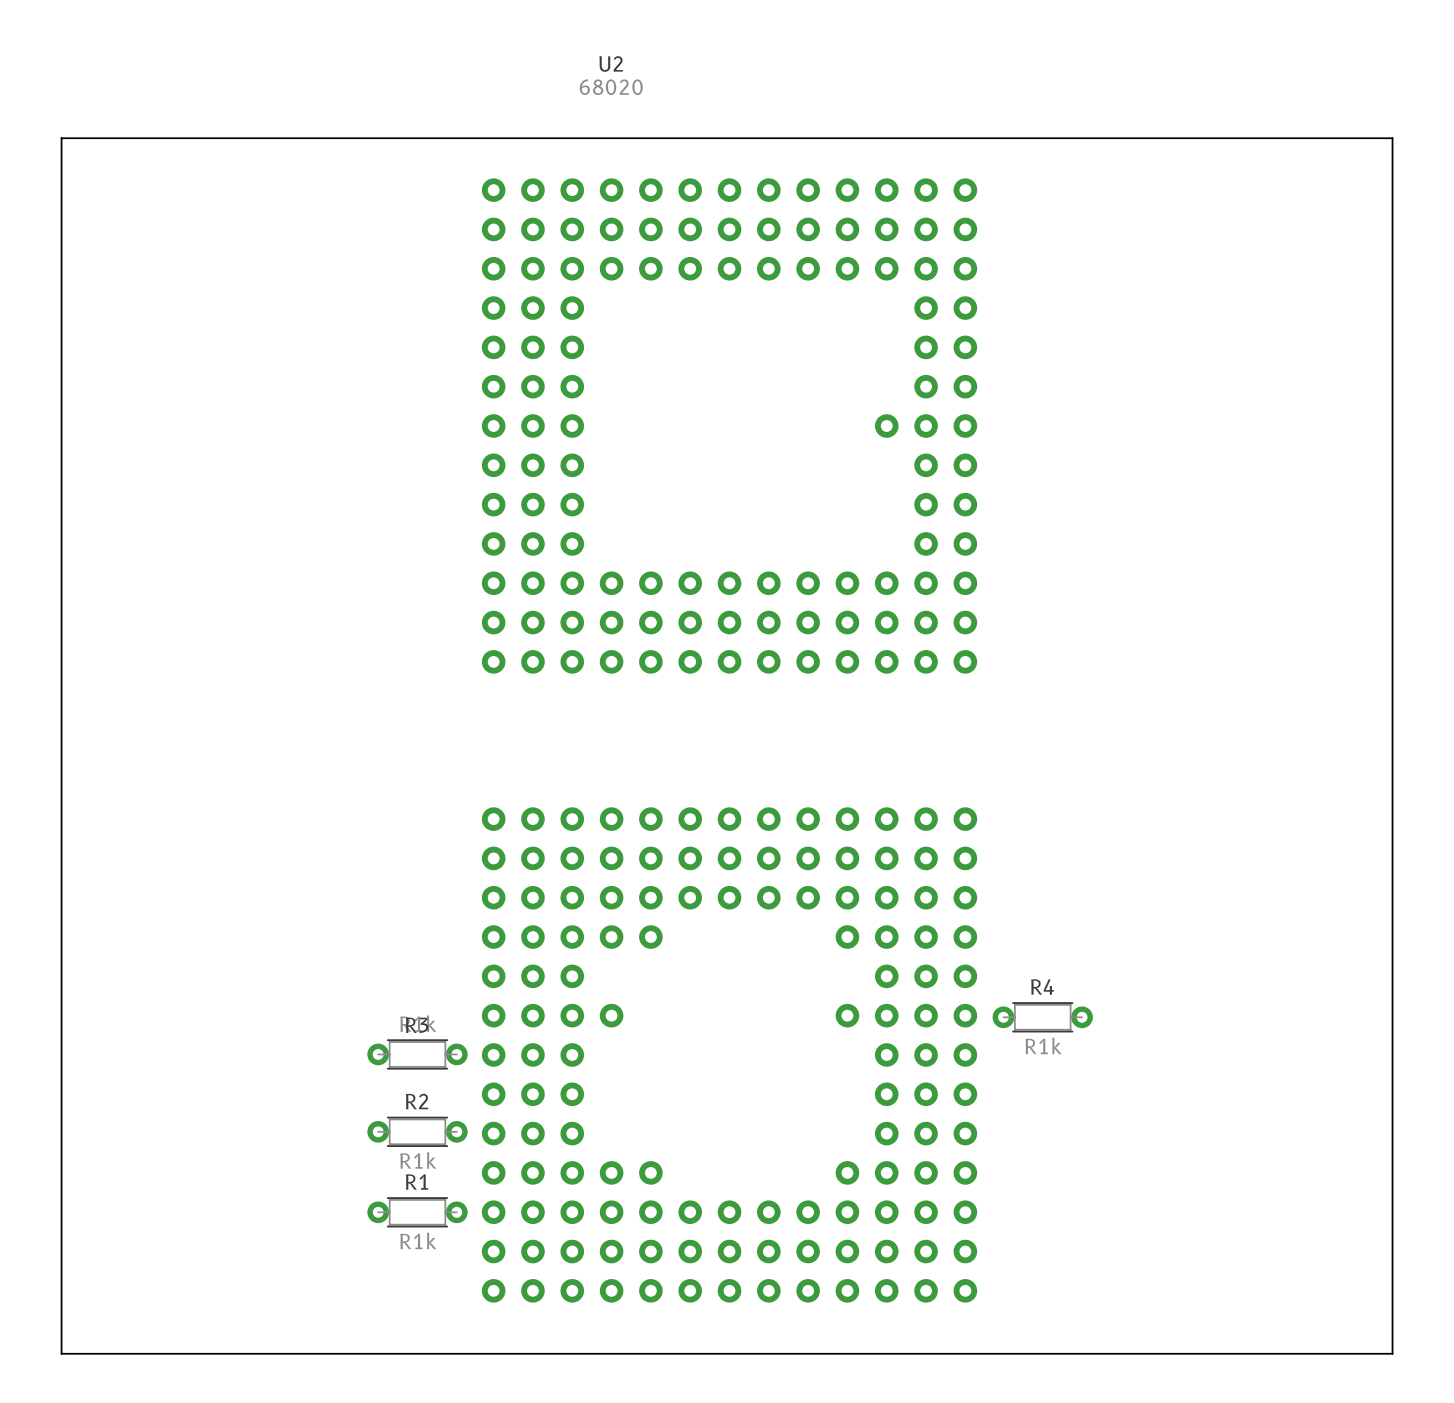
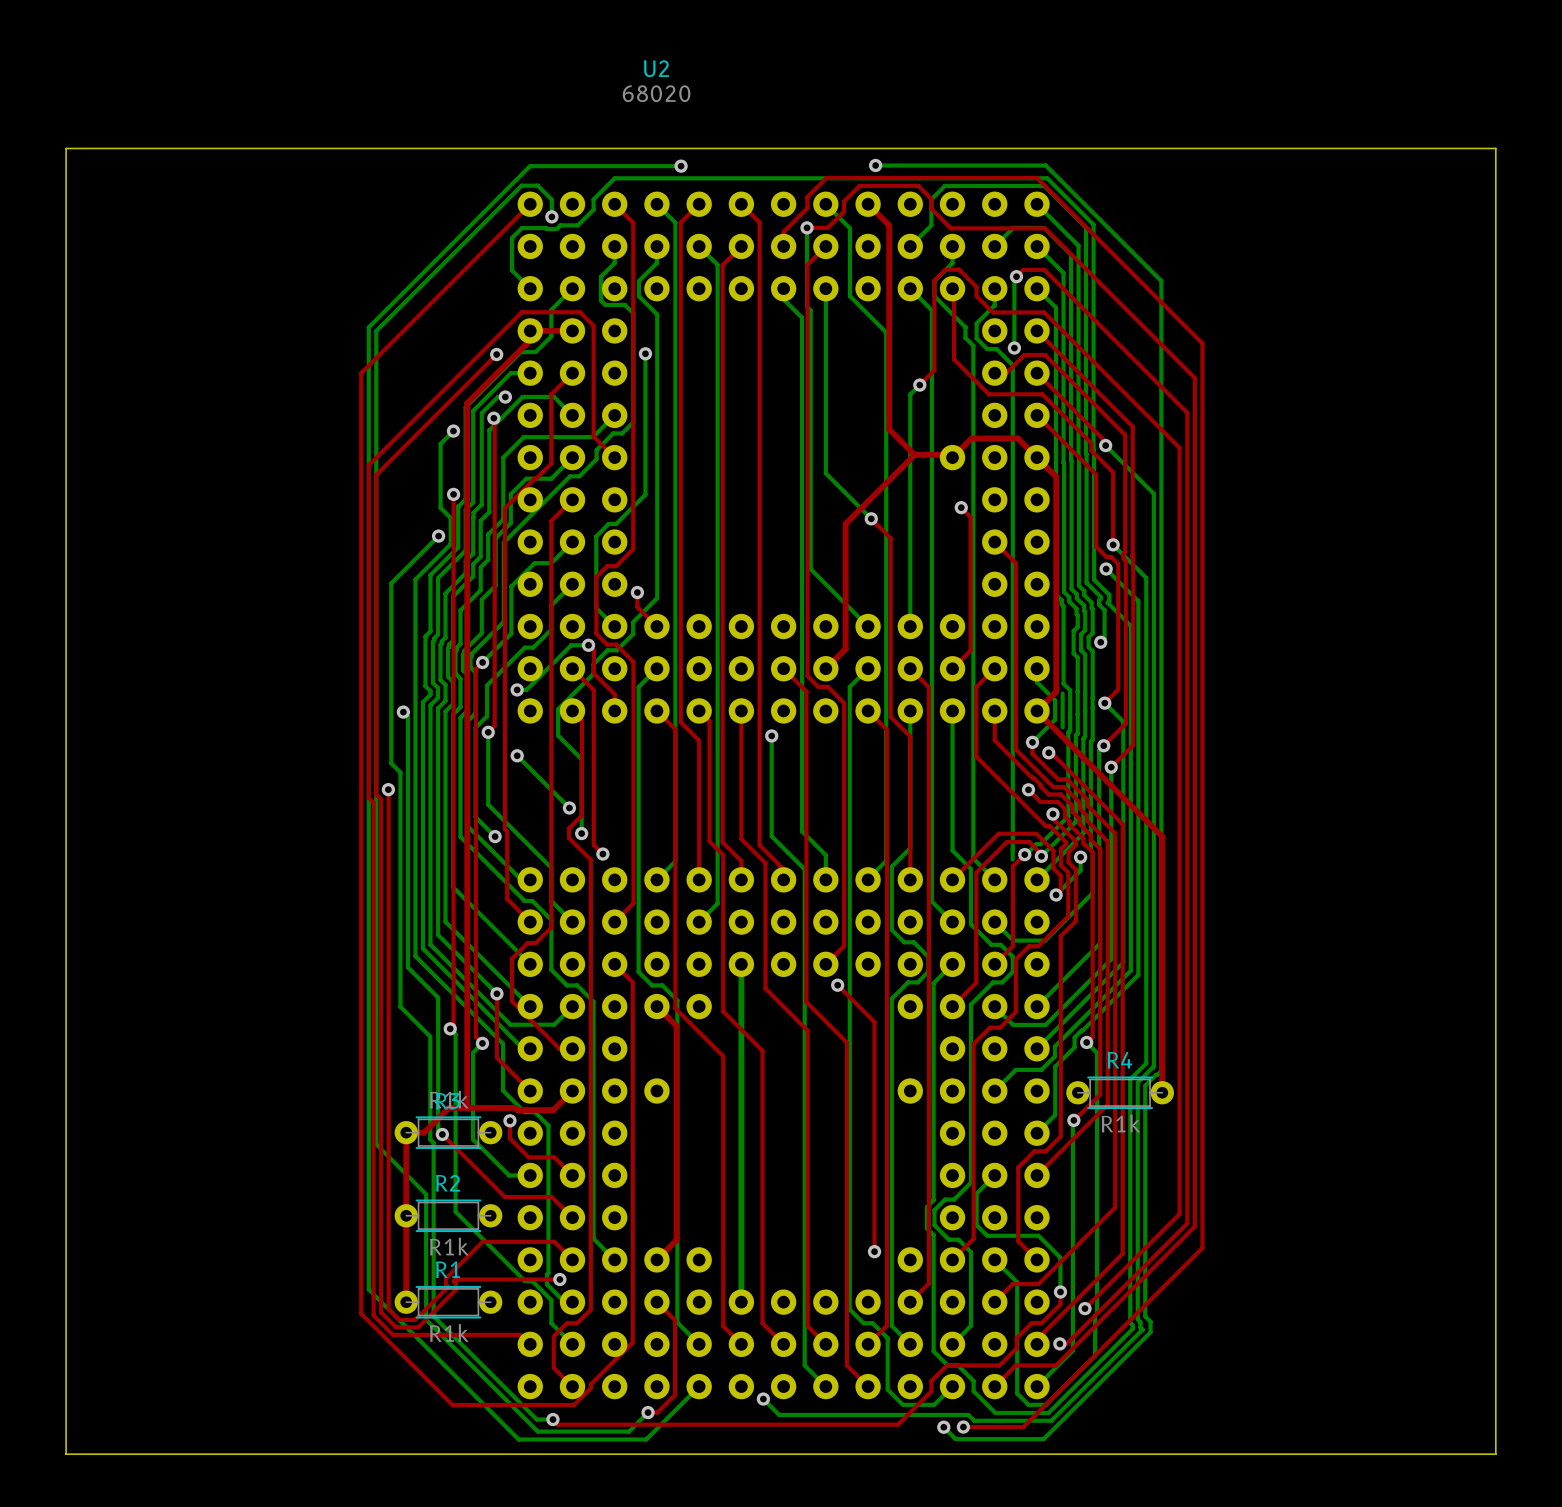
bottom track: none -> (681, 166) (530, 166) (368, 327) (368, 1289) (518, 1439) (646, 1439) (699, 1386)
via: none -> (681, 166)
bottom track: none -> (875, 165) (1045, 165) (1161, 281) (1161, 1070) (1145, 1085) (1145, 1316) (1150, 1321) (1150, 1332) (1043, 1439) (955, 1439) (943, 1427)
via: none -> (875, 165)
top track: none -> (530, 204) (361, 373) (361, 1313) (452, 1404) (574, 1404) (590, 1388) (590, 1384) (632, 1342) (632, 982) (614, 964)
top track: none -> (614, 204) (633, 222) (633, 549) (616, 566) (607, 566) (596, 576) (596, 633) (607, 644) (616, 644) (633, 661) (633, 903) (614, 922)
bottom track: none -> (656, 204) (675, 222) (675, 861) (656, 879)
top track: none -> (699, 204) (680, 222) (680, 722) (699, 740) (699, 879)
top track: none -> (741, 204) (759, 222) (759, 845) (783, 869) (783, 879)
bottom track: none -> (825, 204) (849, 228) (849, 296) (886, 332) (886, 860) (868, 879)
top track: none -> (868, 204) (889, 225) (889, 429) (914, 454)
bottom track: none -> (1036, 204) (1078, 245) (1079, 585) (1091, 602) (1092, 608) (1092, 633) (1088, 637) (1088, 647) (1092, 651) (1091, 740)
bottom track: none -> (551, 216) (551, 199) (537, 185) (521, 185) (376, 331) (376, 1144) (426, 1194) (426, 1319) (537, 1431) (629, 1431) (648, 1412)
via: none -> (551, 216)
top track: none -> (807, 227) (827, 227) (843, 211) (843, 201) (859, 185) (918, 185) (931, 198) (931, 208) (950, 228) (1045, 228) (1194, 378) (1194, 1226) (1055, 1365) (1015, 1365) (994, 1386)
bottom track: none -> (807, 227) (807, 306) (810, 310) (810, 569) (868, 626)
via: none -> (807, 227)
bottom track: none -> (614, 246) (614, 263) (600, 276) (600, 300) (605, 304) (625, 304) (633, 313) (633, 422) (622, 433) (613, 433) (596, 450) (596, 459) (579, 476) (570, 476) (503, 542) (503, 621) (471, 653) (470, 657) (470, 667) (475, 672) (475, 713) (468, 720) (468, 826) (521, 879) (530, 879)
bottom track: none -> (656, 246) (656, 263) (638, 281) (638, 296) (657, 314) (657, 598) (633, 622) (633, 634) (616, 650) (607, 650) (593, 664) (593, 673) (558, 709) (558, 735) (581, 759) (581, 833)
bottom track: none -> (699, 246) (717, 264) (717, 903) (699, 922)
top track: none -> (741, 246) (722, 265) (722, 842) (741, 861) (741, 879)
top track: none -> (783, 246) (783, 232) (807, 208) (807, 197) (826, 177) (1036, 177) (1202, 343) (1202, 1248) (1023, 1427) (963, 1427)
top track: none -> (825, 246) (807, 264) (807, 676) (818, 686) (827, 686) (844, 703) (844, 946) (825, 964)
bottom track: none -> (910, 246) (931, 225) (931, 199) (944, 185) (1044, 185) (1086, 227) (1086, 582) (1100, 597) (1099, 604) (1104, 610) (1104, 638) (1100, 642)
bottom track: none -> (952, 246) (952, 263) (934, 281) (934, 296) (965, 327) (965, 337) (973, 345) (973, 858) (994, 879)
bottom track: none -> (994, 246) (1013, 227) (1044, 227) (1071, 254) (1071, 588) (1084, 605) (1085, 612) (1085, 630) (1081, 634) (1081, 650) (1085, 654) (1084, 737)
bottom track: none -> (1036, 246) (1063, 273) (1064, 592) (1076, 608) (1077, 615) (1077, 626) (1073, 631) (1073, 653) (1077, 657) (1076, 734)
top track: none -> (1016, 276) (1023, 269) (1044, 269) (1187, 412) (1187, 1223) (1066, 1343) (1059, 1343)
bottom track: none -> (1016, 276) (1014, 278) (1014, 348)
via: none -> (1016, 276)
bottom track: none -> (530, 288) (512, 270) (512, 237) (521, 228) (556, 229) (560, 225) (578, 225) (593, 209) (593, 199) (614, 178) (1047, 178) (1093, 224) (1094, 579) (1109, 594) (1107, 602) (1130, 625) (1130, 970) (1055, 1046) (1055, 1056) (1041, 1069) (1015, 1069) (994, 1091)
bottom track: none -> (572, 288) (551, 309) (551, 336) (535, 352) (520, 352) (465, 407) (465, 499) (458, 506) (458, 547) (430, 575) (430, 631) (425, 636) (425, 686) (430, 691) (430, 694) (422, 702) (422, 948) (523, 1048) (530, 1048)
bottom track: none -> (783, 288) (783, 299) (802, 317) (802, 831) (825, 855) (825, 879)
bottom track: none -> (825, 288) (825, 473) (871, 518)
bottom track: none -> (910, 288) (931, 310) (931, 901) (952, 922)
top track: none -> (952, 288) (954, 290) (954, 359) (988, 394) (1042, 394) (1091, 443) (1091, 450) (1113, 472) (1113, 544)
bottom track: none -> (994, 288) (994, 305) (976, 323) (976, 338) (987, 349) (996, 349) (1012, 365) (1012, 849)
bottom track: none -> (1036, 288) (1056, 307) (1056, 594) (1061, 600) (1063, 606) (1063, 683) (1070, 690) (1069, 731)
top track: none -> (572, 330) (530, 330) (530, 340) (467, 403) (467, 1107)
top track: none -> (1036, 330) (1132, 426) (1133, 745) (1111, 767)
via: none -> (1014, 348)
bottom track: none -> (645, 353) (645, 494) (616, 523) (608, 523) (596, 536) (596, 608) (614, 626)
via: none -> (645, 353)
top track: none -> (496, 354) (376, 474) (376, 794) (381, 799) (381, 1312) (396, 1327) (418, 1327) (455, 1289) (455, 1283) (453, 1281)
via: none -> (496, 354)
bottom track: none -> (530, 373) (510, 373) (473, 410) (473, 502) (465, 509) (465, 550) (438, 578) (438, 634) (432, 641) (432, 683) (438, 688) (438, 697) (430, 705) (430, 944) (510, 1024) (554, 1024) (572, 1006)
top track: none -> (572, 373) (551, 394) (551, 463) (504, 508) (504, 829) (507, 831) (507, 899) (530, 922)
top track: none -> (994, 373) (1006, 373) (1024, 354) (1045, 354) (1125, 435) (1125, 552) (1123, 558) (1125, 560) (1125, 723) (1103, 745)
top track: none -> (1036, 373) (1105, 441) (1105, 445)
top track: none -> (919, 385) (934, 370) (934, 280) (945, 269) (959, 269) (976, 287) (976, 296) (992, 312) (1044, 312) (1179, 447) (1179, 1213) (1084, 1308)
bottom track: none -> (919, 385) (910, 394) (910, 626)
via: none -> (919, 385)
bottom track: none -> (505, 397) (497, 397) (481, 413) (481, 504) (473, 512) (473, 553) (465, 561) (465, 573) (445, 593) (445, 637) (440, 645) (440, 679) (445, 684) (445, 700) (438, 708) (438, 934) (496, 993)
via: none -> (505, 397)
bottom track: none -> (572, 415) (554, 396) (522, 396) (489, 430) (489, 512) (480, 520) (480, 556) (473, 564) (473, 576) (453, 596) (453, 640) (448, 648) (448, 676) (453, 681) (453, 704) (445, 711) (445, 921) (530, 1006)
bottom track: none -> (614, 415) (592, 437) (523, 437) (503, 457) (503, 519) (488, 534) (488, 559) (480, 567) (480, 590) (460, 610) (460, 643) (455, 651) (455, 673) (460, 678) (460, 707) (453, 714) (453, 887) (530, 964)
top track: none -> (1036, 415) (1096, 474) (1096, 546) (1106, 556) (1111, 556) (1118, 564) (1118, 689) (1104, 703)
top track: none -> (493, 418) (494, 725) (488, 732)
via: none -> (493, 418)
bottom track: none -> (453, 431) (440, 443) (440, 507) (450, 517) (450, 544) (415, 579) (415, 956) (503, 1043) (503, 1090) (524, 1112) (534, 1112) (548, 1125) (546, 1284) (564, 1302) (572, 1302)
via: none -> (453, 431)
bottom track: none -> (1105, 445) (1153, 493) (1153, 1066) (1137, 1082) (1137, 1319) (1142, 1329) (1051, 1420) (974, 1420) (968, 1414) (779, 1414) (763, 1399)
via: none -> (1105, 445)
top track: none -> (914, 454) (949, 454) (952, 457) (971, 438) (1017, 438) (1056, 476) (1056, 691) (1036, 710)
top track: none -> (914, 454) (845, 523) (845, 648) (825, 668)
bottom track: none -> (572, 457) (551, 478) (526, 478) (510, 494) (510, 523) (495, 538) (495, 585) (481, 599) (481, 633) (463, 654) (463, 670) (468, 675) (468, 710) (460, 717) (460, 836) (524, 900) (532, 900) (551, 919) (551, 969) (566, 985) (577, 985) (593, 1001) (593, 1238) (614, 1259)
top track: none -> (614, 457) (593, 436) (593, 325) (580, 312) (521, 312) (368, 465) (368, 797) (373, 802) (373, 1315) (393, 1334) (520, 1334) (530, 1344)
top track: none -> (453, 494) (453, 1025) (450, 1028)
via: none -> (453, 494)
top track: none -> (572, 499) (551, 520) (551, 927) (535, 943) (527, 943) (511, 958) (511, 1001) (559, 1048) (572, 1048)
top track: none -> (961, 507) (970, 517) (970, 650) (952, 668)
via: none -> (961, 507)
top track: none -> (871, 518) (890, 538) (890, 716) (910, 736) (910, 879)
via: none -> (871, 518)
bottom track: none -> (438, 536) (391, 583) (391, 763) (400, 772) (400, 1006) (430, 1036) (430, 1139) (433, 1142) (433, 1316) (536, 1419) (552, 1419)
via: none -> (438, 536)
bottom track: none -> (572, 542) (551, 563) (534, 563) (511, 586) (511, 633) (482, 662)
top track: none -> (994, 542) (1015, 563) (1015, 749) (1053, 786) (1064, 786) (1080, 802) (1080, 808) (1087, 815) (1087, 820) (1107, 841) (1107, 1104) (1036, 1175)
bottom track: none -> (1113, 544) (1146, 577) (1146, 1063) (1130, 1079) (1130, 1322) (1132, 1328) (1048, 1412) (995, 1412) (973, 1391) (973, 1381) (958, 1365) (947, 1365) (933, 1351) (933, 1235) (926, 1228) (926, 1207) (933, 1200) (933, 983) (952, 964)
via: none -> (1113, 544)
bottom track: none -> (1106, 569) (1138, 601) (1138, 974) (1074, 1037) (1074, 1047) (1055, 1066) (1055, 1114) (1036, 1133)
via: none -> (1106, 569)
bottom track: none -> (572, 584) (551, 605) (551, 629) (533, 647) (524, 647) (487, 685) (487, 716) (475, 727) (475, 817) (495, 836)
top track: none -> (637, 592) (637, 606) (656, 626)
via: none -> (637, 592)
via: none -> (1100, 642)
top track: none -> (588, 645) (593, 650) (593, 673) (614, 694) (614, 710)
bottom track: none -> (588, 645) (571, 645) (526, 689) (517, 689)
via: none -> (588, 645)
top track: none -> (482, 662) (475, 669) (475, 1036) (482, 1043)
via: none -> (482, 662)
top track: none -> (572, 668) (593, 690) (593, 844) (602, 854)
bottom track: none -> (656, 668) (638, 687) (638, 971) (652, 985) (662, 985) (677, 1000) (677, 1322) (699, 1344)
top track: none -> (783, 668) (806, 691) (806, 1002) (846, 1042) (846, 1365) (868, 1386)
bottom track: none -> (868, 668) (849, 687) (849, 1309) (863, 1323) (872, 1323) (887, 1338) (887, 1389) (902, 1404) (934, 1404) (952, 1386)
top track: none -> (910, 668) (928, 687) (928, 1283) (910, 1302)
top track: none -> (994, 668) (976, 687) (976, 756) (1045, 826) (1050, 826) (1066, 842) (1061, 849) (1061, 865) (1068, 872) (1068, 916) (1038, 946) (1029, 946) (1015, 959) (1015, 1012) (1000, 1027) (989, 1027) (973, 1043) (973, 1238) (952, 1259)
bottom track: none -> (1036, 668) (1036, 682) (1055, 700) (1055, 719) (1032, 742)
via: none -> (517, 689)
bottom track: none -> (1062, 693) (1062, 727)
bottom track: none -> (1104, 703) (1123, 721) (1123, 962) (1036, 1048)
via: none -> (1104, 703)
top track: none -> (572, 710) (581, 720) (581, 815) (569, 828) (569, 838) (590, 859) (590, 1309) (577, 1323) (566, 1323) (553, 1336) (553, 1367) (572, 1386)
top track: none -> (656, 710) (675, 729) (675, 1008) (723, 1056) (723, 1326) (741, 1344)
top track: none -> (699, 710) (709, 721) (709, 841) (723, 855) (723, 1011) (762, 1050) (762, 1323) (783, 1344)
top track: none -> (741, 710) (741, 839) (765, 863) (765, 988) (807, 1030) (807, 1326) (825, 1344)
top track: none -> (868, 710) (887, 729) (887, 1325) (868, 1344)
bottom track: none -> (910, 710) (910, 848) (891, 866) (891, 929) (904, 942) (913, 942) (928, 956) (928, 971) (917, 982) (908, 982) (891, 998) (891, 1325) (910, 1344)
bottom track: none -> (952, 710) (952, 850) (971, 869) (971, 924) (991, 944) (1000, 944) (1012, 956) (1012, 971) (1002, 982) (993, 982) (971, 1004) (971, 1182) (954, 1199) (945, 1199) (934, 1210) (934, 1225) (948, 1239) (958, 1239) (971, 1252) (971, 1325) (952, 1344)
top track: none -> (994, 710) (994, 740) (1048, 794) (1061, 794) (1072, 805) (1072, 811) (1079, 818) (1079, 823) (1090, 835) (1090, 839) (1100, 849) (1100, 1094) (1073, 1120)
bottom track: none -> (403, 712) (407, 716) (407, 967) (438, 997) (438, 1130) (442, 1134)
via: none -> (403, 712)
top track: none -> (1036, 711) (1162, 836) (1162, 1092)
bottom track: none -> (488, 732) (488, 804) (551, 867) (551, 900) (572, 922)
via: none -> (488, 732)
bottom track: none -> (1069, 731) (1068, 816) (1040, 844) (1036, 844) (1024, 854)
bottom track: none -> (1076, 734) (1075, 821) (1041, 856)
bottom track: none -> (771, 735) (771, 836) (804, 869) (804, 1365) (825, 1386)
via: none -> (771, 735)
bottom track: none -> (1084, 737) (1083, 833) (1036, 879)
bottom track: none -> (1091, 741) (1090, 850) (1092, 852) (1092, 893) (1045, 940) (1013, 940) (994, 922)
top track: none -> (1032, 742) (1032, 753) (1058, 779) (1067, 779) (1087, 799) (1087, 805) (1115, 833) (1115, 1207) (1038, 1284) (1012, 1284) (994, 1302)
via: none -> (1032, 742)
bottom track: none -> (1103, 745) (1099, 750) (1100, 943) (1036, 1006)
via: none -> (1103, 745)
top track: none -> (1048, 752) (1051, 752) (1122, 824) (1122, 1253) (1036, 1339) (1036, 1344)
via: none -> (1048, 752)
bottom track: none -> (517, 755) (569, 808)
via: none -> (517, 755)
bottom track: none -> (1111, 767) (1111, 959) (1045, 1024) (1013, 1024) (994, 1006)
via: none -> (1111, 767)
top track: none -> (388, 789) (388, 1309) (399, 1319) (415, 1319) (447, 1287) (445, 1278) (482, 1241) (554, 1241) (572, 1259)
via: none -> (388, 789)
top track: none -> (1028, 789) (1040, 802) (1057, 802) (1065, 809) (1065, 816) (1069, 821) (1069, 824) (1083, 838) (1083, 843) (1092, 852) (1092, 1036) (1086, 1042)
via: none -> (1028, 789)
via: none -> (569, 808)
top track: none -> (1052, 814) (1052, 818) (1075, 841) (1075, 844) (1068, 852) (1068, 862) (1075, 869) (1075, 921) (1060, 936) (1060, 1136) (1045, 1151) (1034, 1151) (1018, 1167) (1018, 1241) (1036, 1259)
via: none -> (1052, 814)
via: none -> (581, 833)
via: none -> (495, 836)
bottom track: none -> (1012, 849) (1012, 859)
via: none -> (602, 854)
top track: none -> (1024, 854) (1013, 866) (1013, 946) (994, 964)
via: none -> (1024, 854)
top track: none -> (1041, 856) (1029, 842) (1006, 842) (976, 872) (976, 982) (952, 1006)
via: none -> (1041, 856)
bottom track: none -> (1080, 857) (1080, 870) (1056, 894)
via: none -> (1080, 857)
top track: none -> (952, 879) (998, 833) (1036, 833) (1053, 850) (1053, 868) (1060, 875) (1060, 890) (1056, 894)
via: none -> (1056, 894)
bottom track: none -> (741, 964) (741, 1302)
top track: none -> (837, 985) (874, 1022) (874, 1251)
via: none -> (837, 985)
top track: none -> (496, 993) (496, 1057) (530, 1091)
via: none -> (496, 993)
top track: none -> (656, 1006) (676, 1026) (676, 1240) (656, 1259)
bottom track: none -> (450, 1028) (455, 1034) (455, 1211) (524, 1281) (532, 1281) (551, 1300) (551, 1323) (572, 1344)
via: none -> (450, 1028)
bottom track: none -> (1086, 1042) (1097, 1052) (1097, 1313) (1095, 1315) (1095, 1355) (1046, 1404) (1028, 1404) (1017, 1393) (1017, 1282) (994, 1259)
via: none -> (1086, 1042)
bottom track: none -> (482, 1043) (473, 1052) (473, 1139) (509, 1175) (530, 1175)
via: none -> (482, 1043)
top track: none -> (572, 1091) (553, 1110) (448, 1107) (424, 1132) (406, 1132) (406, 1302)
top track: none -> (509, 1120) (509, 1138) (528, 1157) (554, 1157) (572, 1175)
via: none -> (509, 1120)
bottom track: none -> (1073, 1120) (1072, 1350) (1036, 1386)
via: none -> (1073, 1120)
top track: none -> (442, 1134) (504, 1197) (551, 1197) (572, 1217)
via: none -> (442, 1134)
bottom track: none -> (994, 1175) (976, 1193) (976, 1225) (987, 1235) (1038, 1235) (1060, 1257) (1060, 1291)
via: none -> (874, 1251)
top track: none -> (559, 1279) (455, 1279) (453, 1281)
via: none -> (559, 1279)
top track: none -> (1060, 1291) (1060, 1304) (1041, 1323) (1031, 1323) (1016, 1338) (1016, 1348) (999, 1365) (947, 1365) (931, 1381) (931, 1391) (898, 1424) (558, 1424) (552, 1419)
via: none -> (1060, 1291)
top track: none -> (656, 1302) (675, 1320) (675, 1395) (657, 1412) (648, 1412)
via: none -> (1084, 1308)
via: none -> (1059, 1343)
via: none -> (763, 1399)
via: none -> (648, 1412)
via: none -> (552, 1419)
via: none -> (943, 1427)
via: none -> (963, 1427)

